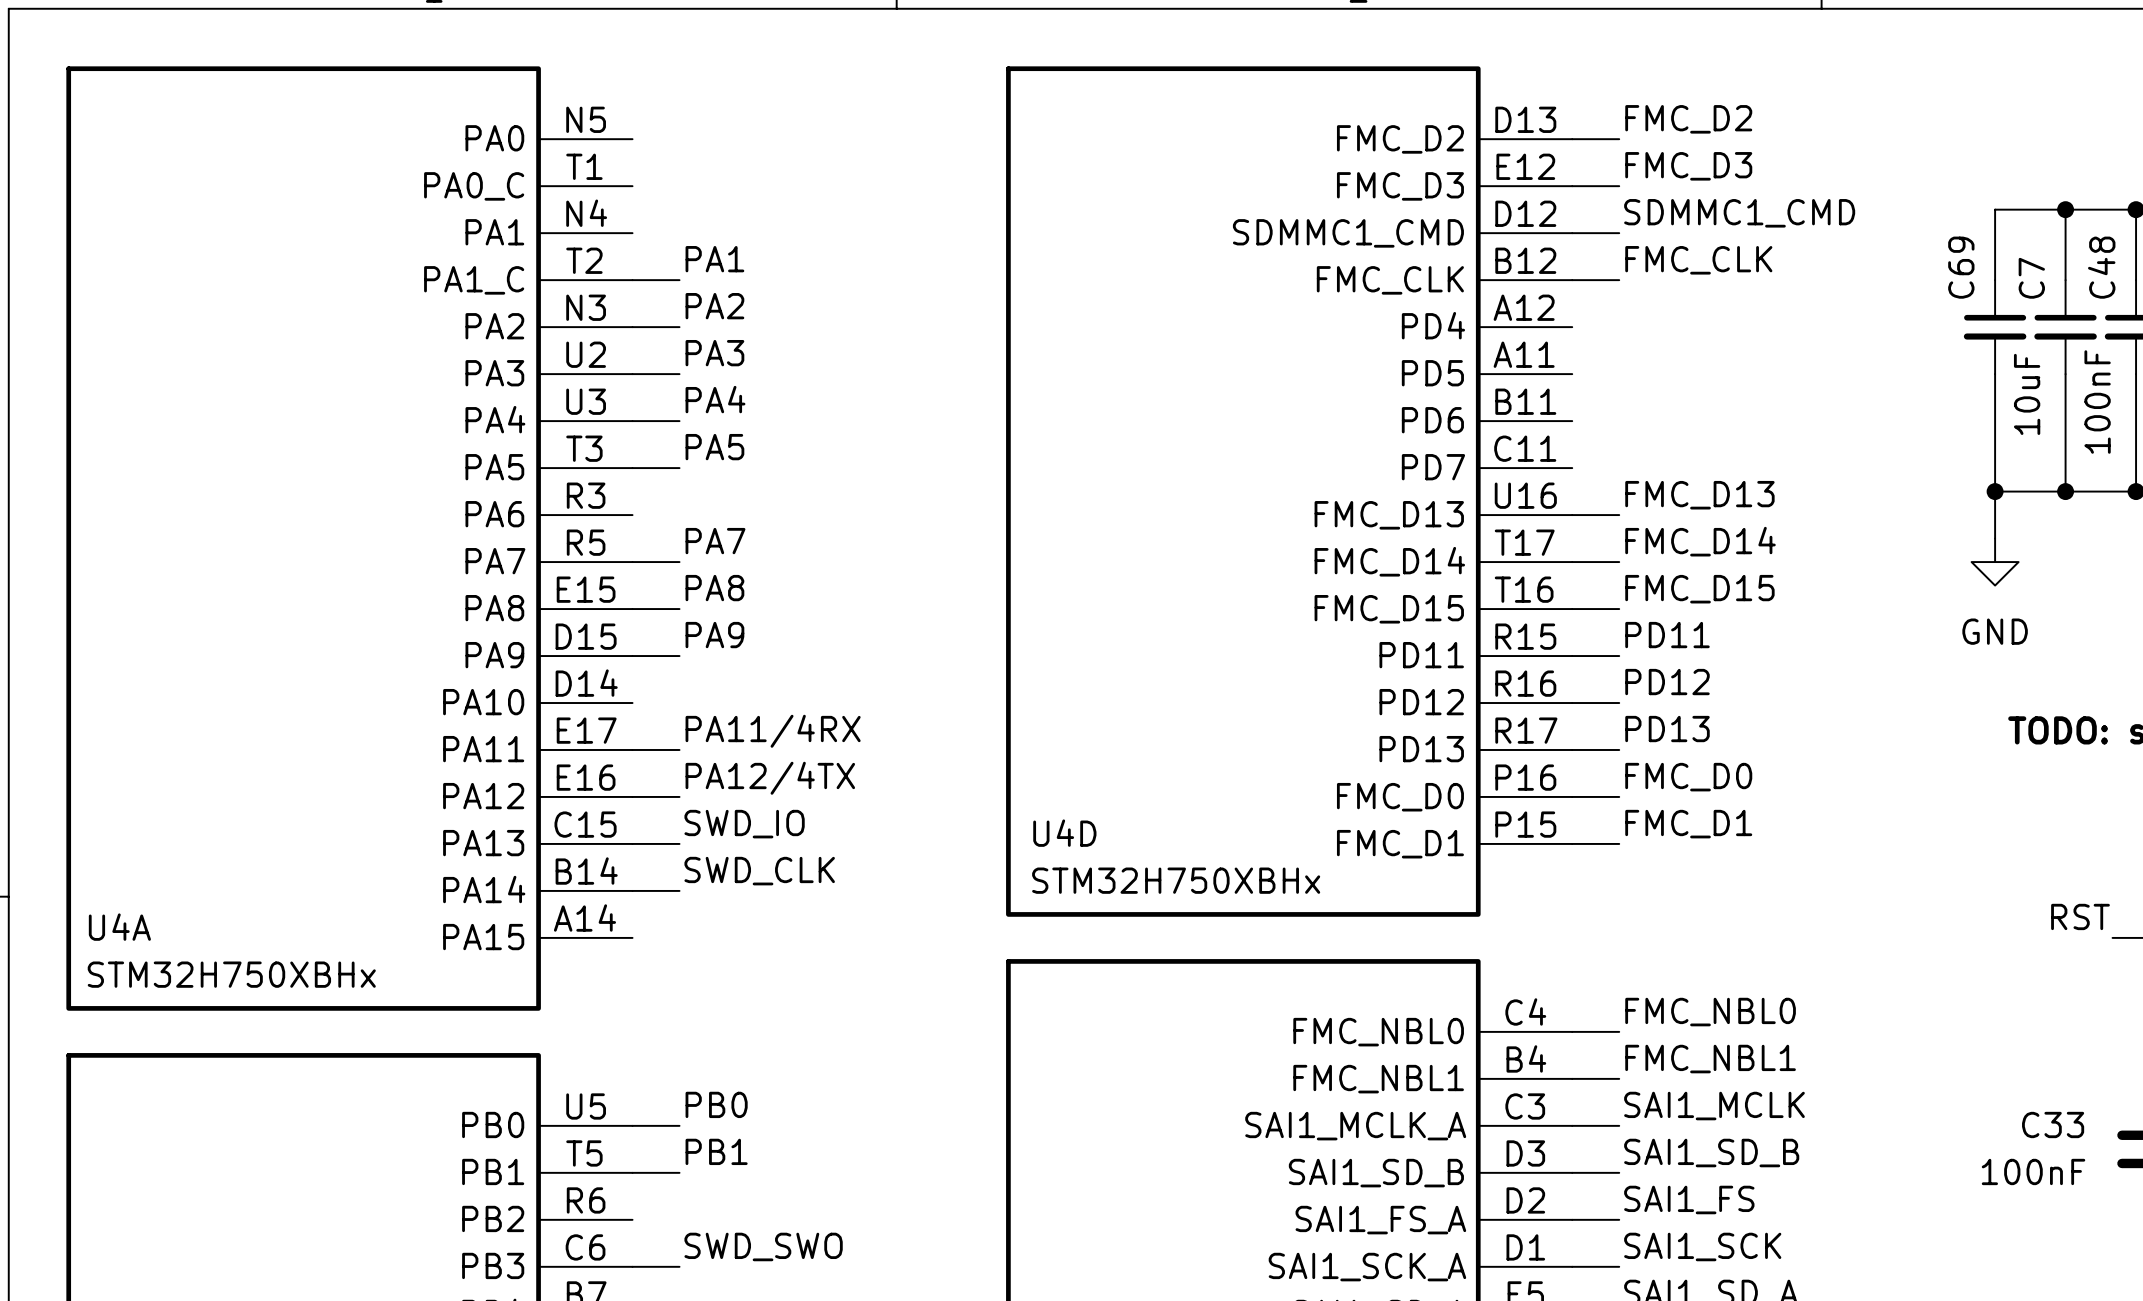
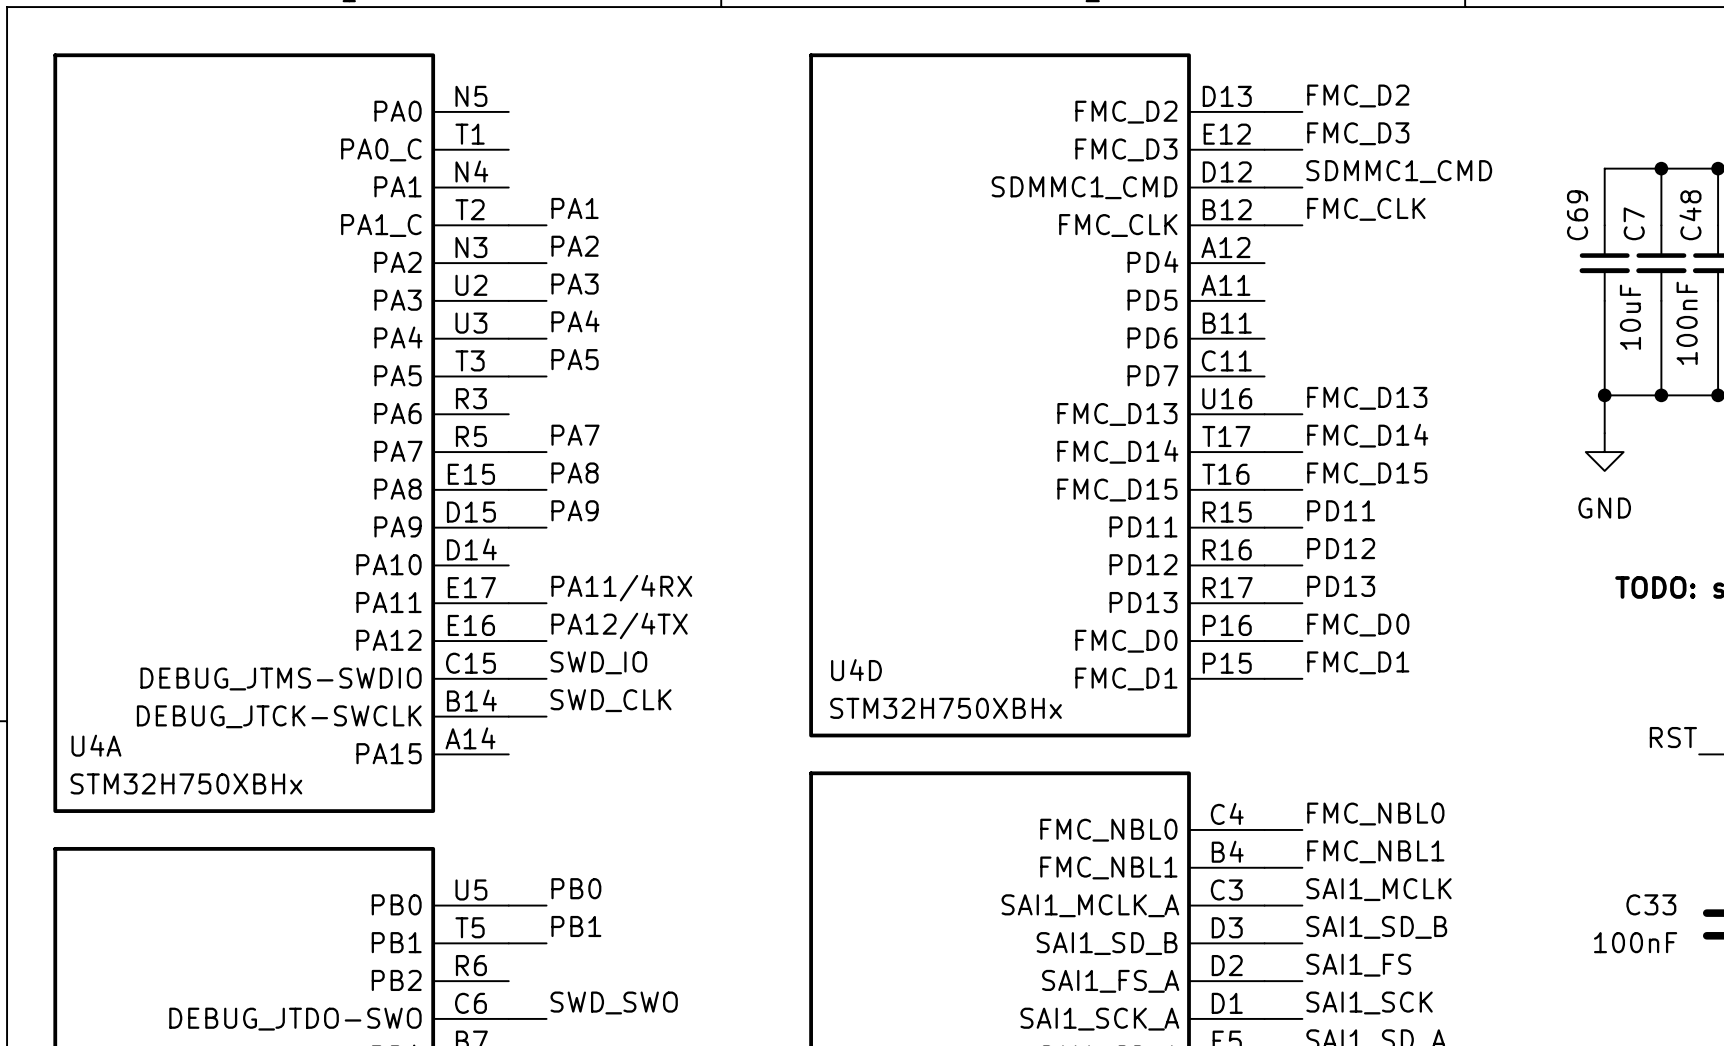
U4A pin name: PA13 (483, 843) -> DEBUG_JTMS-SWDIO (281, 679)
U4A pin name: PA14 (484, 889) -> DEBUG_JTCK-SWCLK (279, 716)
part pin name: PB3 (493, 1265) -> DEBUG_JTDO-SWO (295, 1019)

